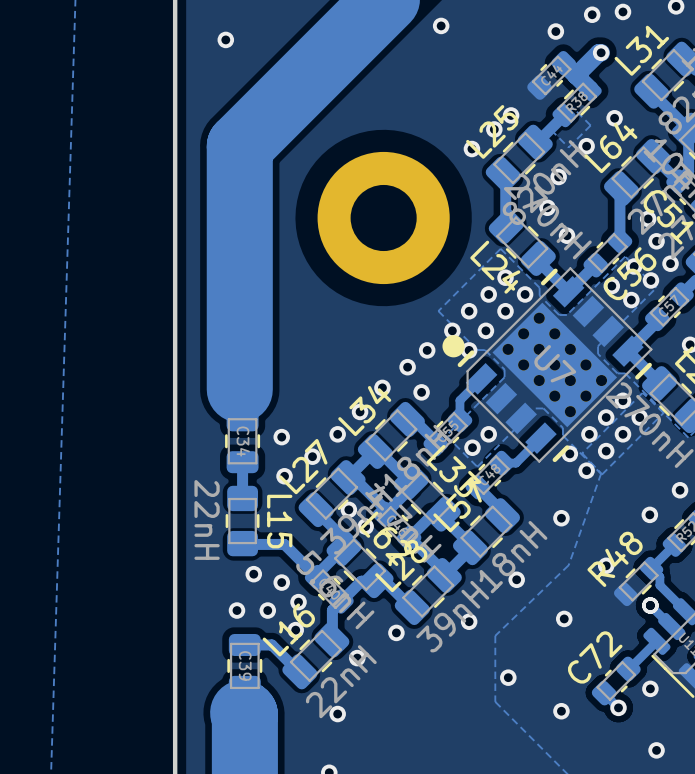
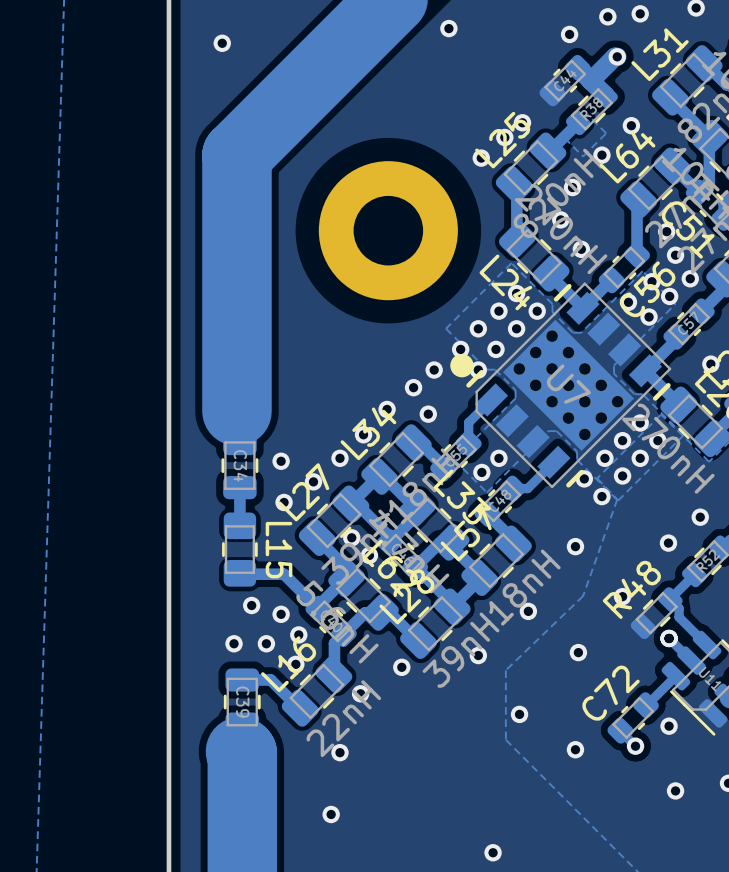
L15 value: 22nH (207, 519) -> none

